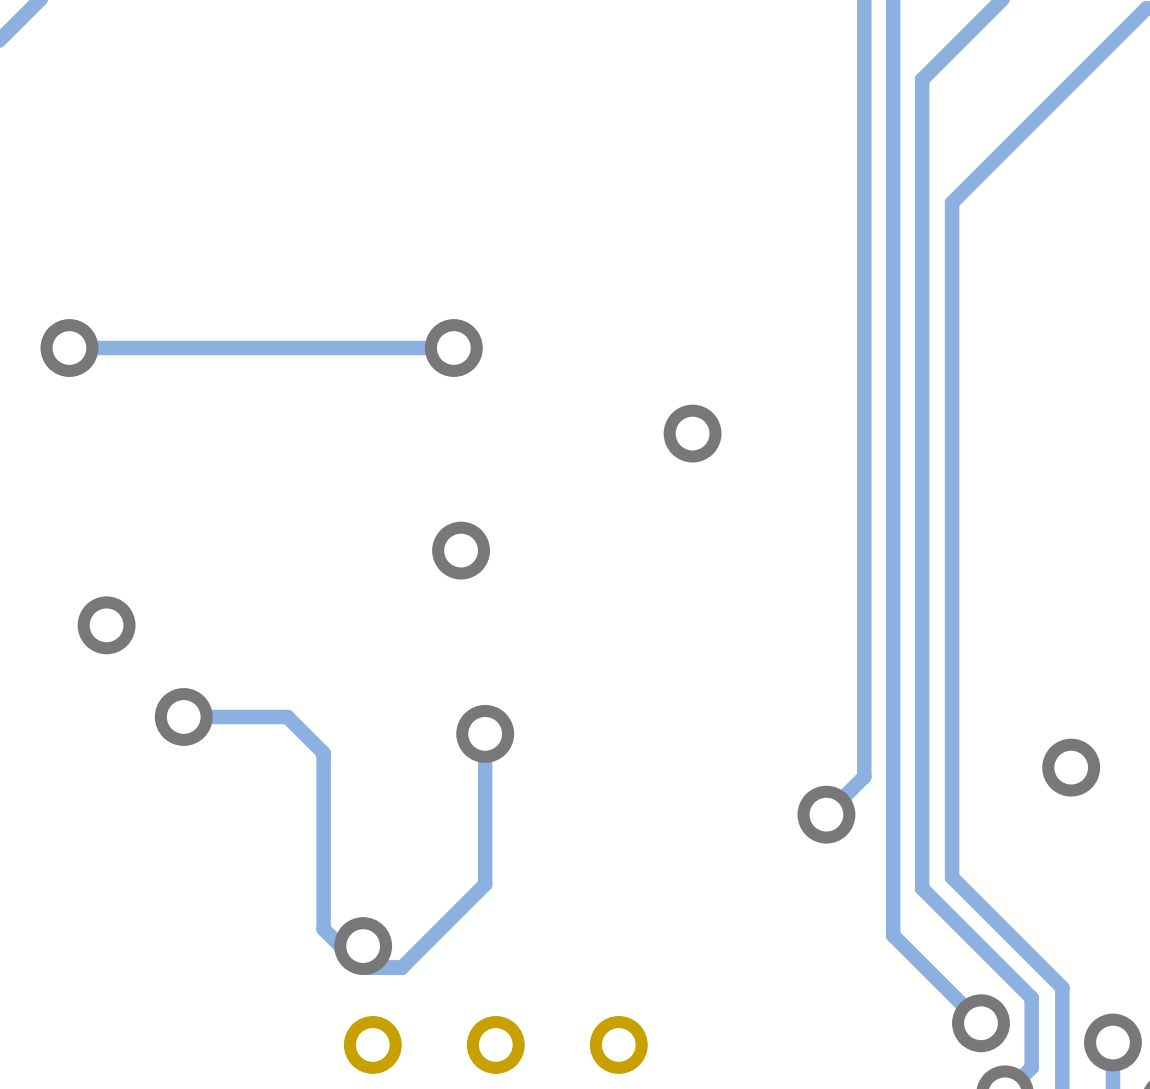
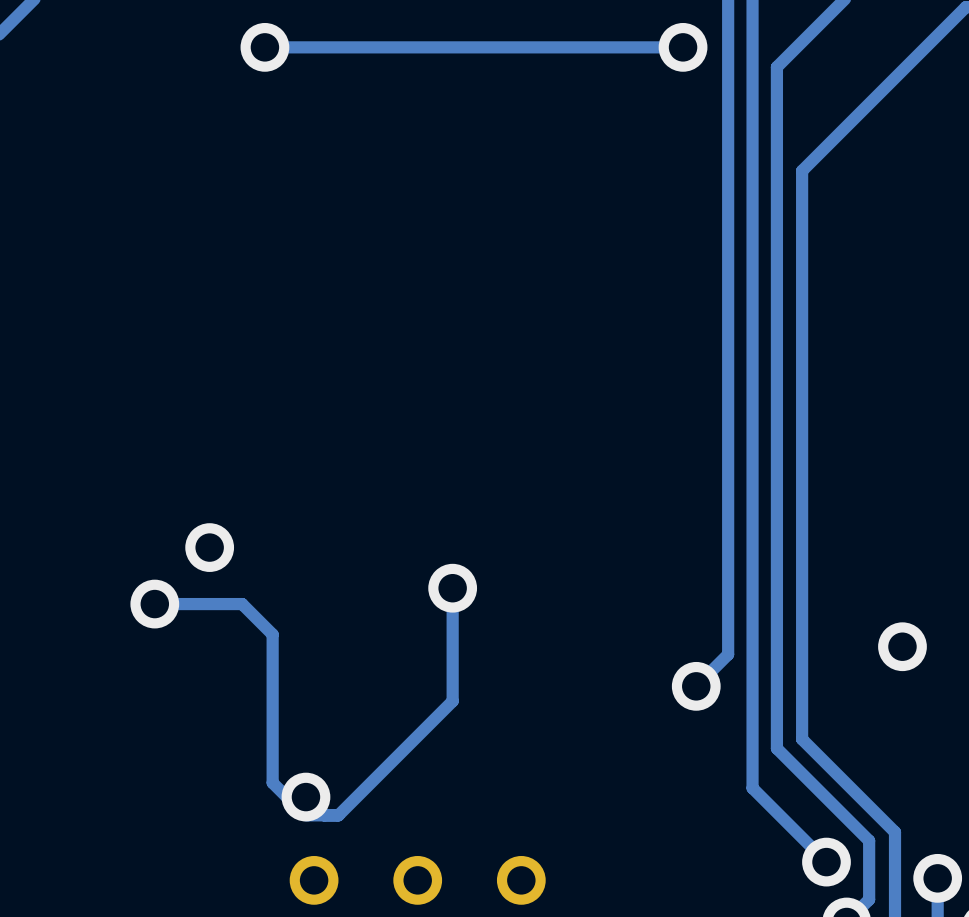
via: none -> (264, 47)
track: none -> (683, 47) (264, 47)
via: none -> (683, 47)
via: (69, 348) -> none
track: (453, 348) (69, 348) -> none
via: (453, 348) -> none
via: (692, 433) -> none
via: (461, 550) -> none
via: (106, 625) -> none
via: none -> (209, 547)
track: (485, 733) (485, 884) -> (452, 588) (452, 701) (408, 745)
via position: (485, 733) -> (452, 588)

